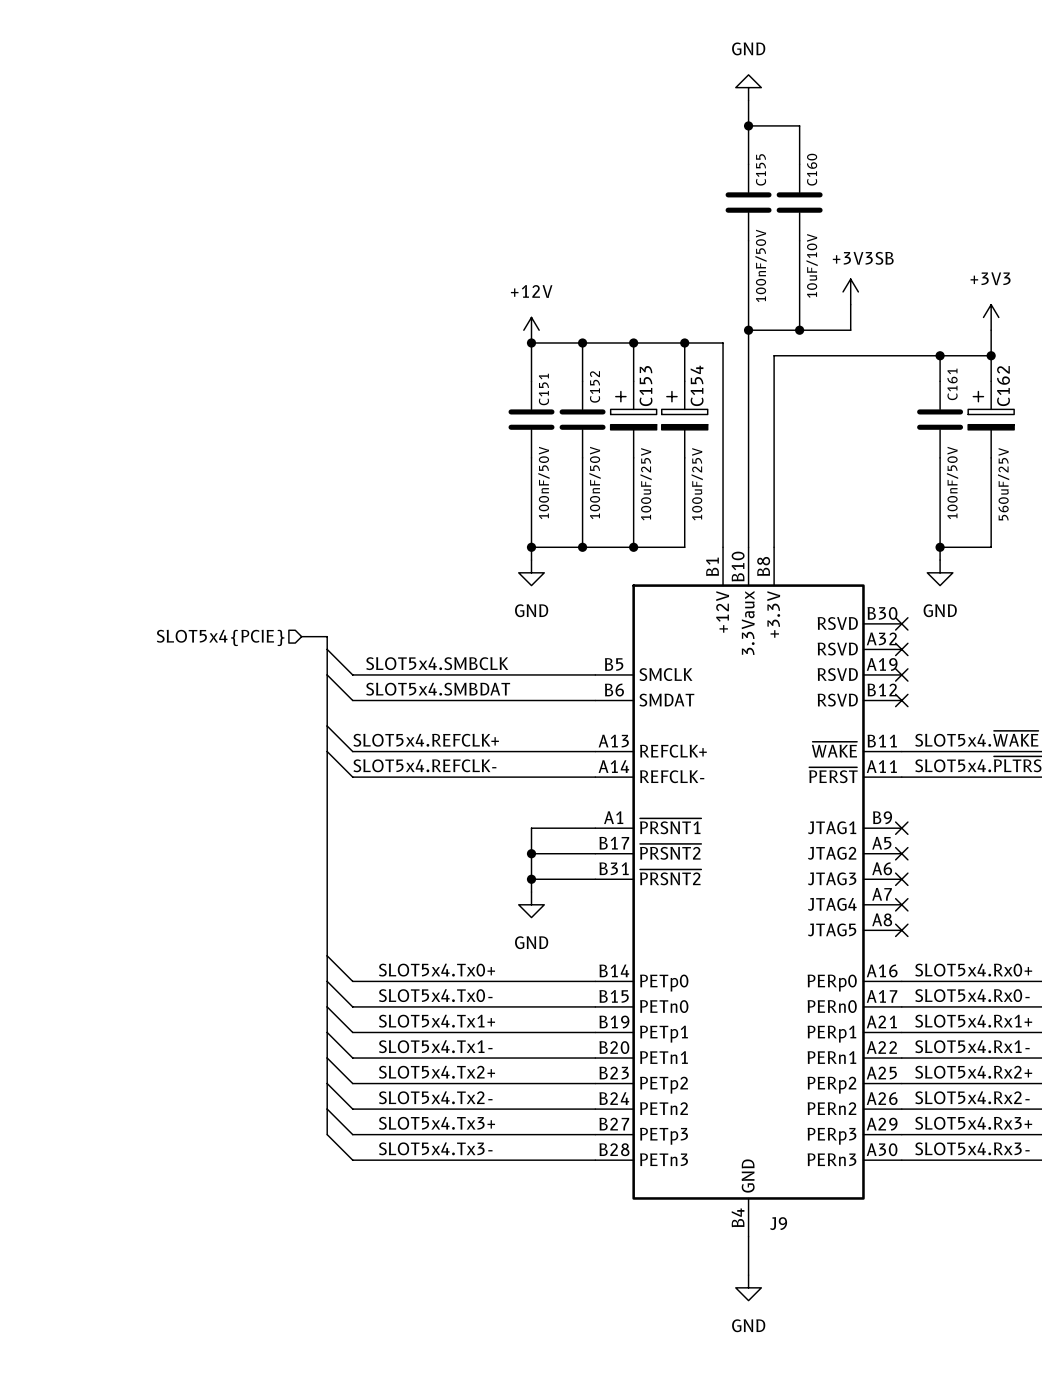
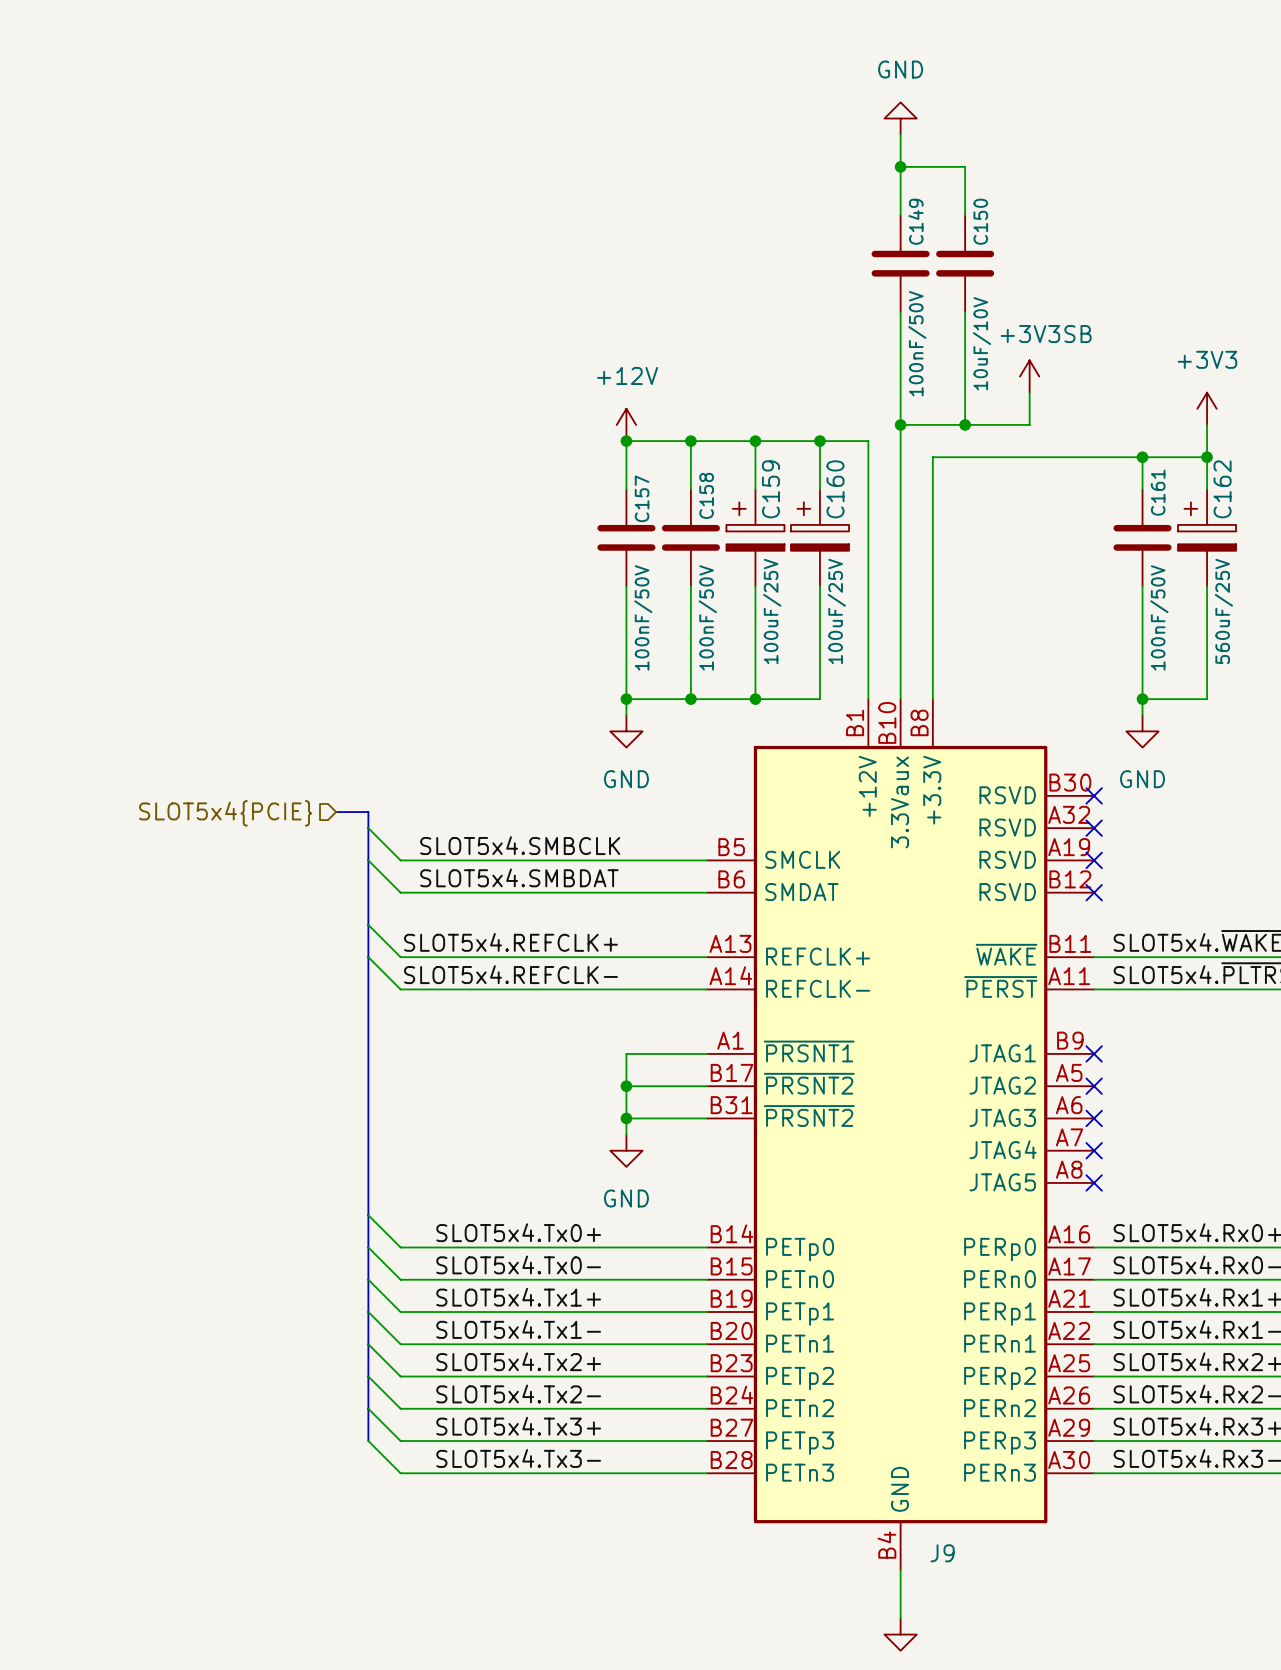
C155 name: C155 (761, 169) -> C149 (915, 221)
C160 name: C160 (812, 169) -> C150 (980, 221)
C154 name: C154 (697, 385) -> C160 (835, 489)
C152 name: C152 (595, 386) -> C158 (706, 495)
C153 name: C153 (646, 386) -> C159 (770, 489)
C151 name: C151 (543, 389) -> C157 (642, 498)

